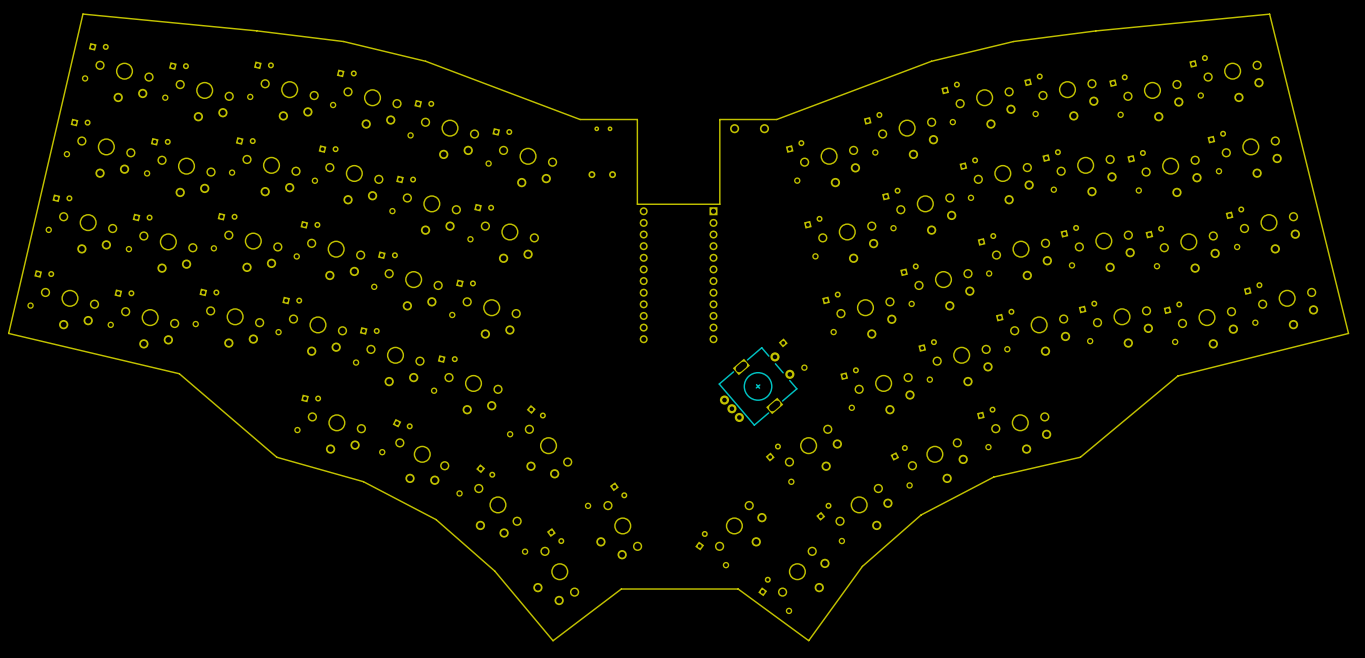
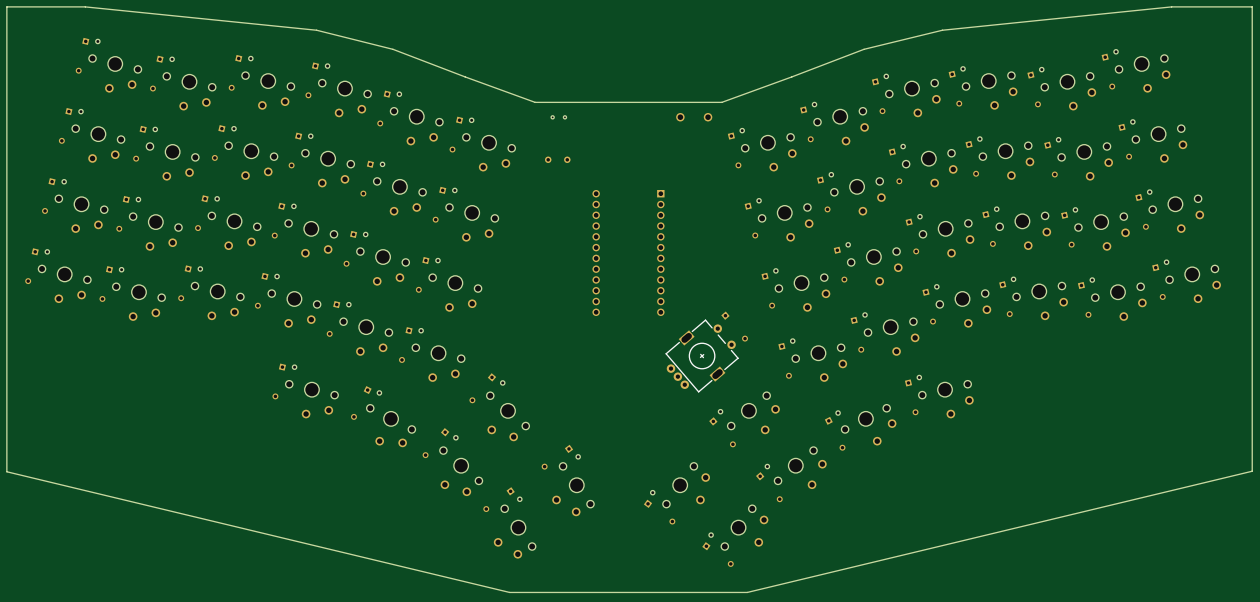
board edge: (82, 14) (8, 333) (179, 373) (276, 457) (363, 481) (436, 519) (494, 571) (553, 640) (621, 589) (738, 589) (808, 640) (862, 566) (921, 515) (993, 477) (1080, 457) (1177, 376) (1348, 333) (1269, 14) (1095, 30) (1013, 41) (931, 61) (776, 119) (719, 119) (719, 204) (637, 204) (637, 119) (580, 119) (425, 61) (343, 41) (256, 30) (82, 14) -> (1252, 6) (1252, 471) (747, 592) (509, 592) (6, 471) (6, 6) (85, 6) (316, 30) (392, 49) (535, 102) (721, 102) (863, 49) (942, 30) (1171, 6) (1252, 6)

